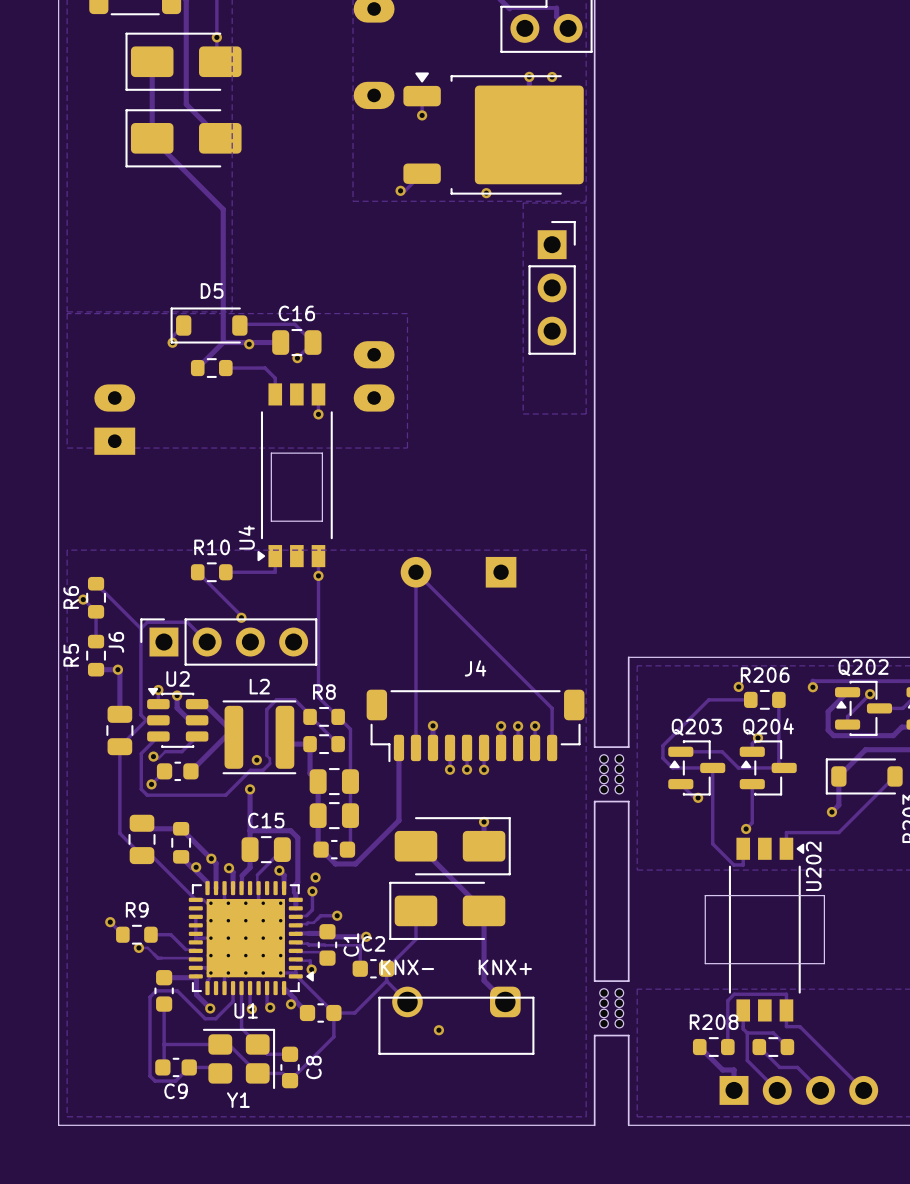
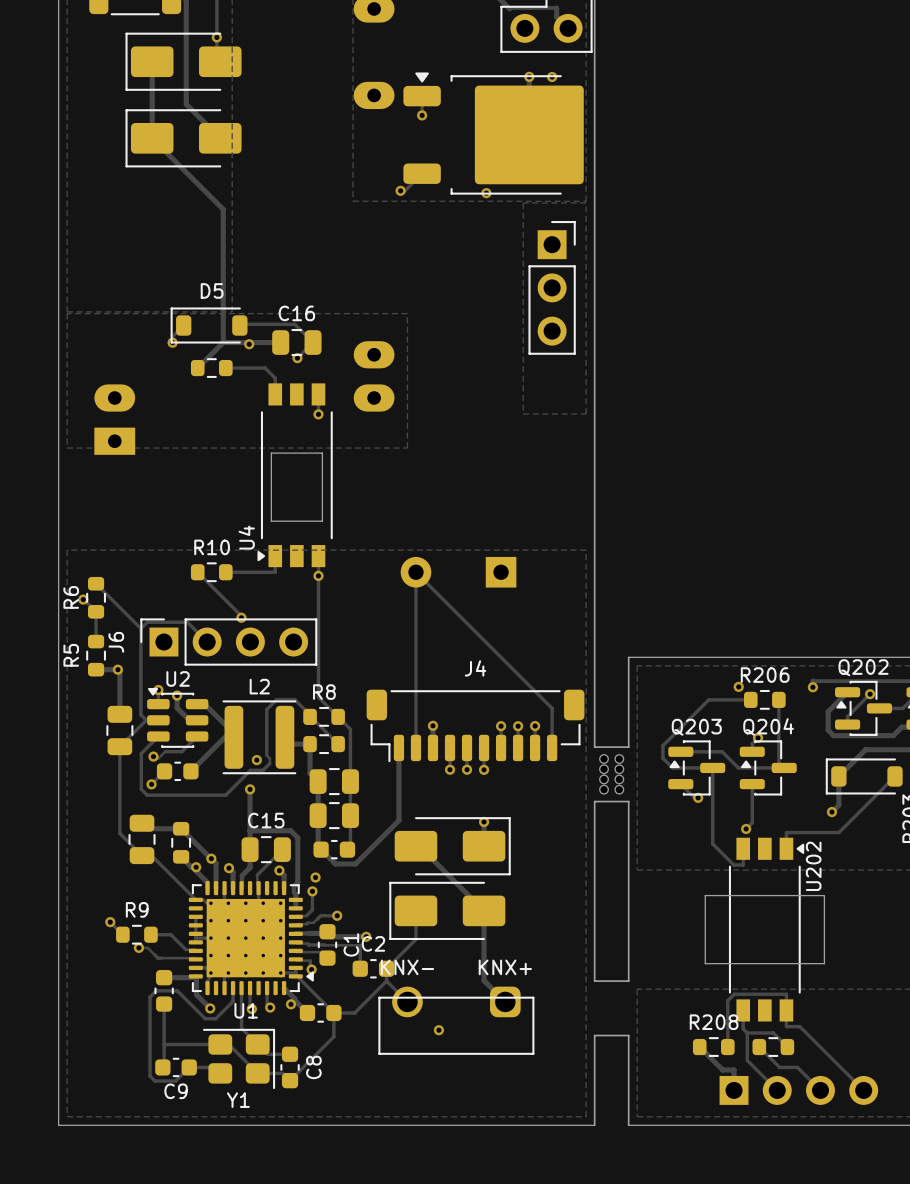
part: (604, 993) -> none
part: (619, 993) -> none
part: (604, 1003) -> none
part: (619, 1003) -> none
part: (604, 1013) -> none
part: (619, 1013) -> none
part: (604, 1023) -> none
part: (619, 1023) -> none

